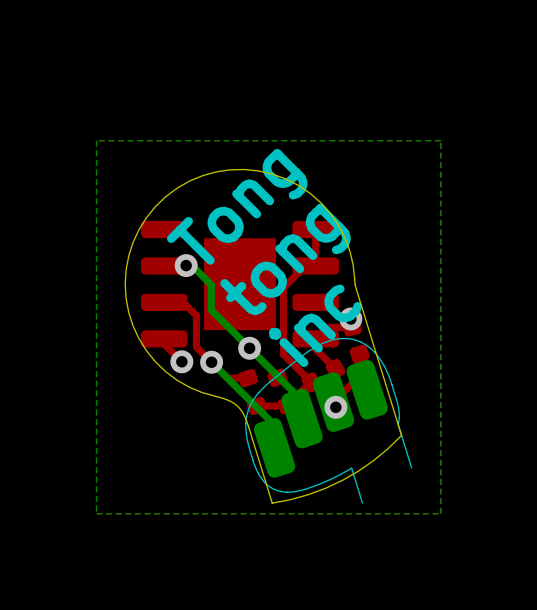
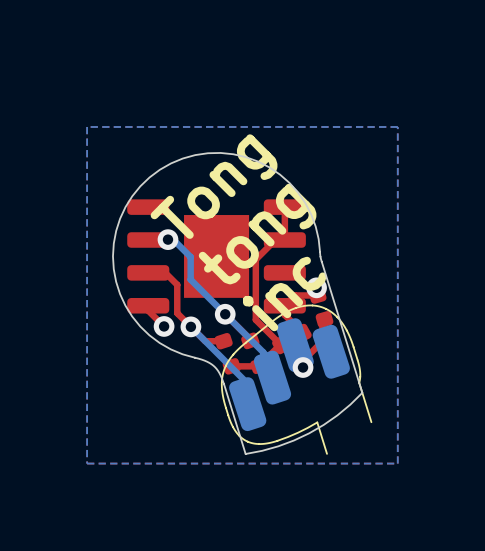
part position: (333, 402) -> (295, 345)

